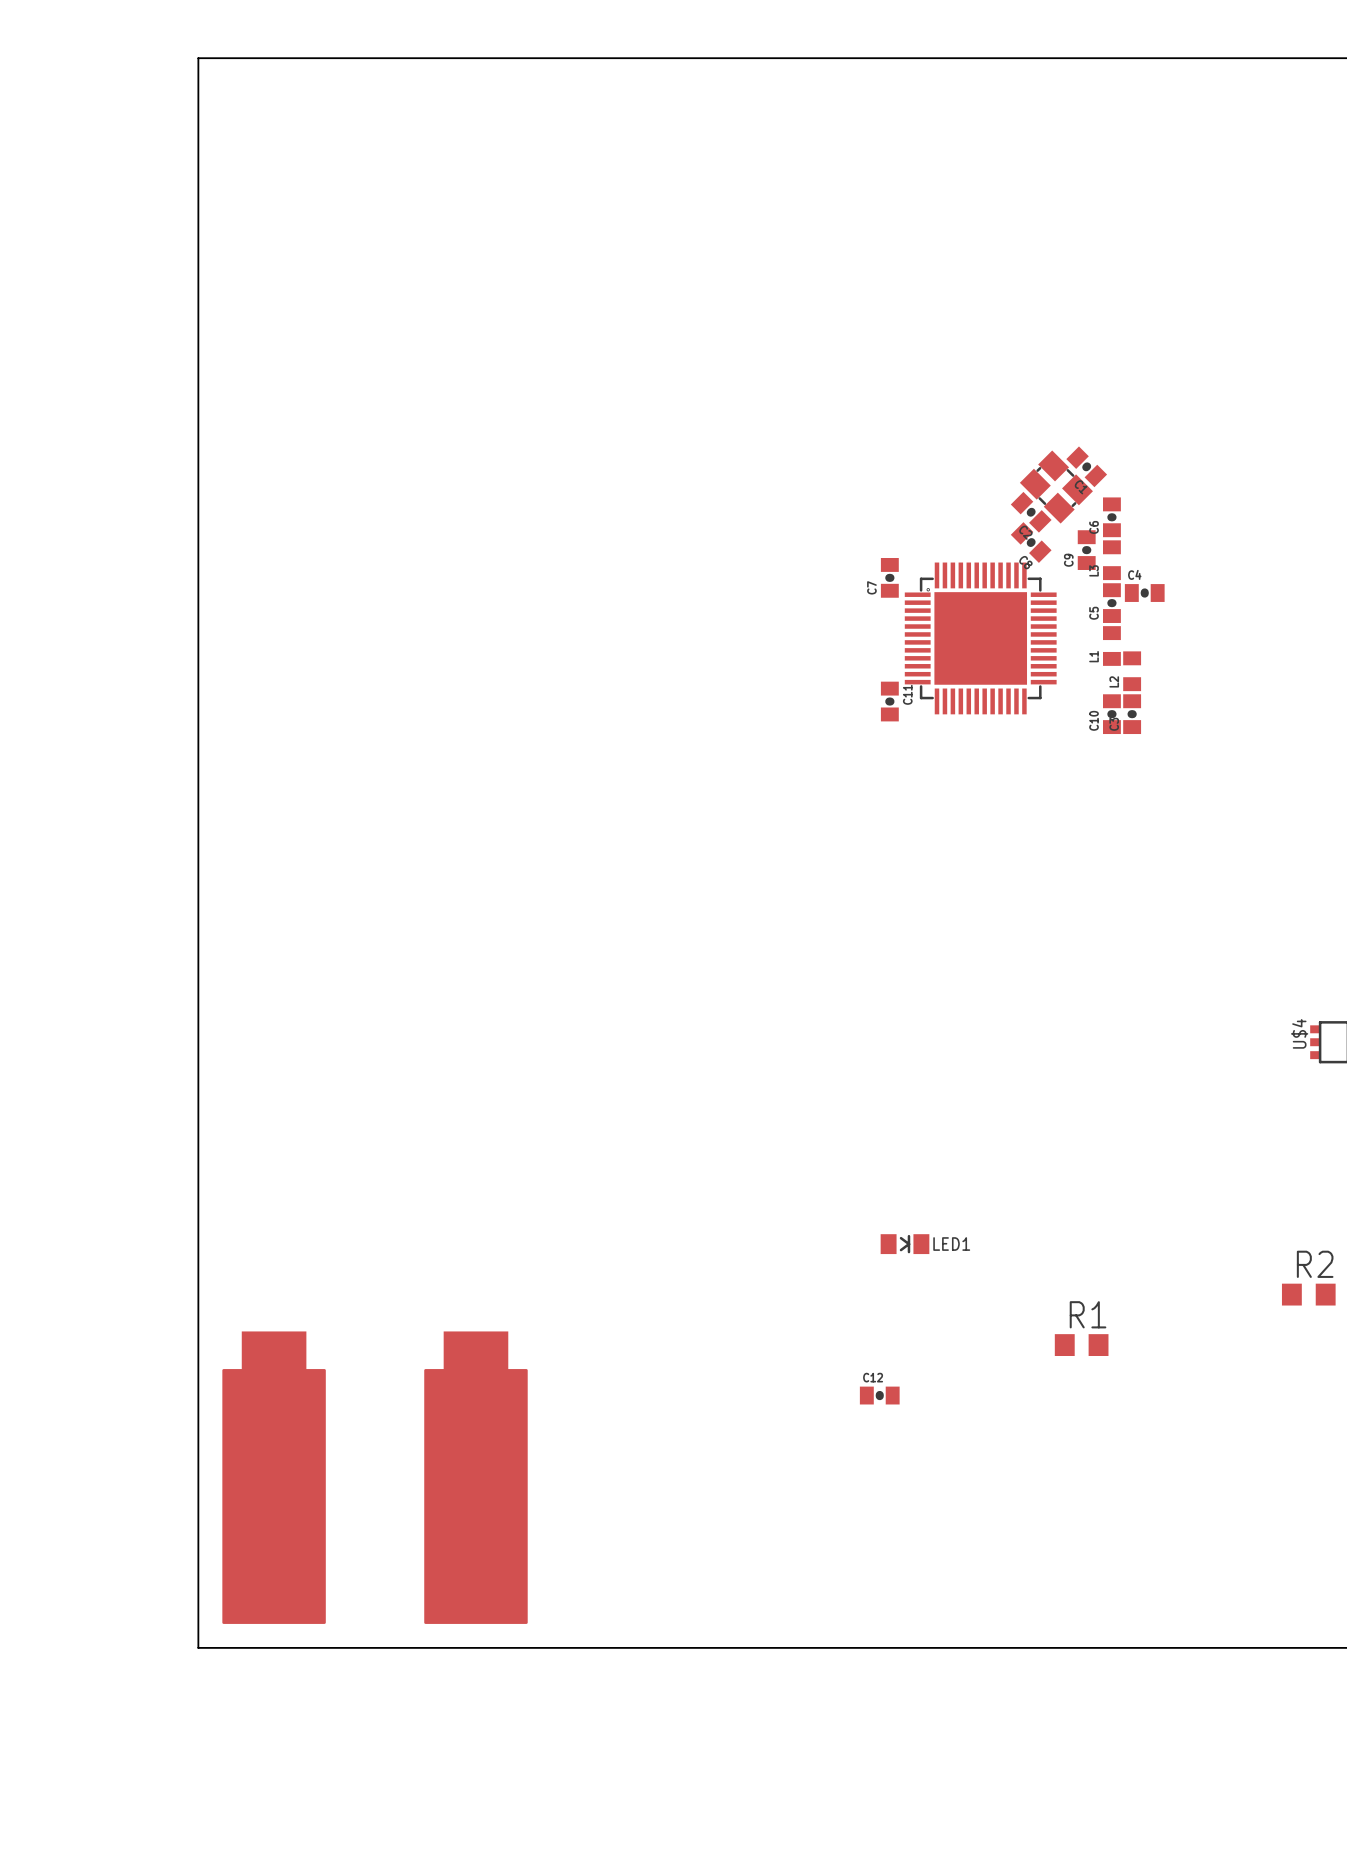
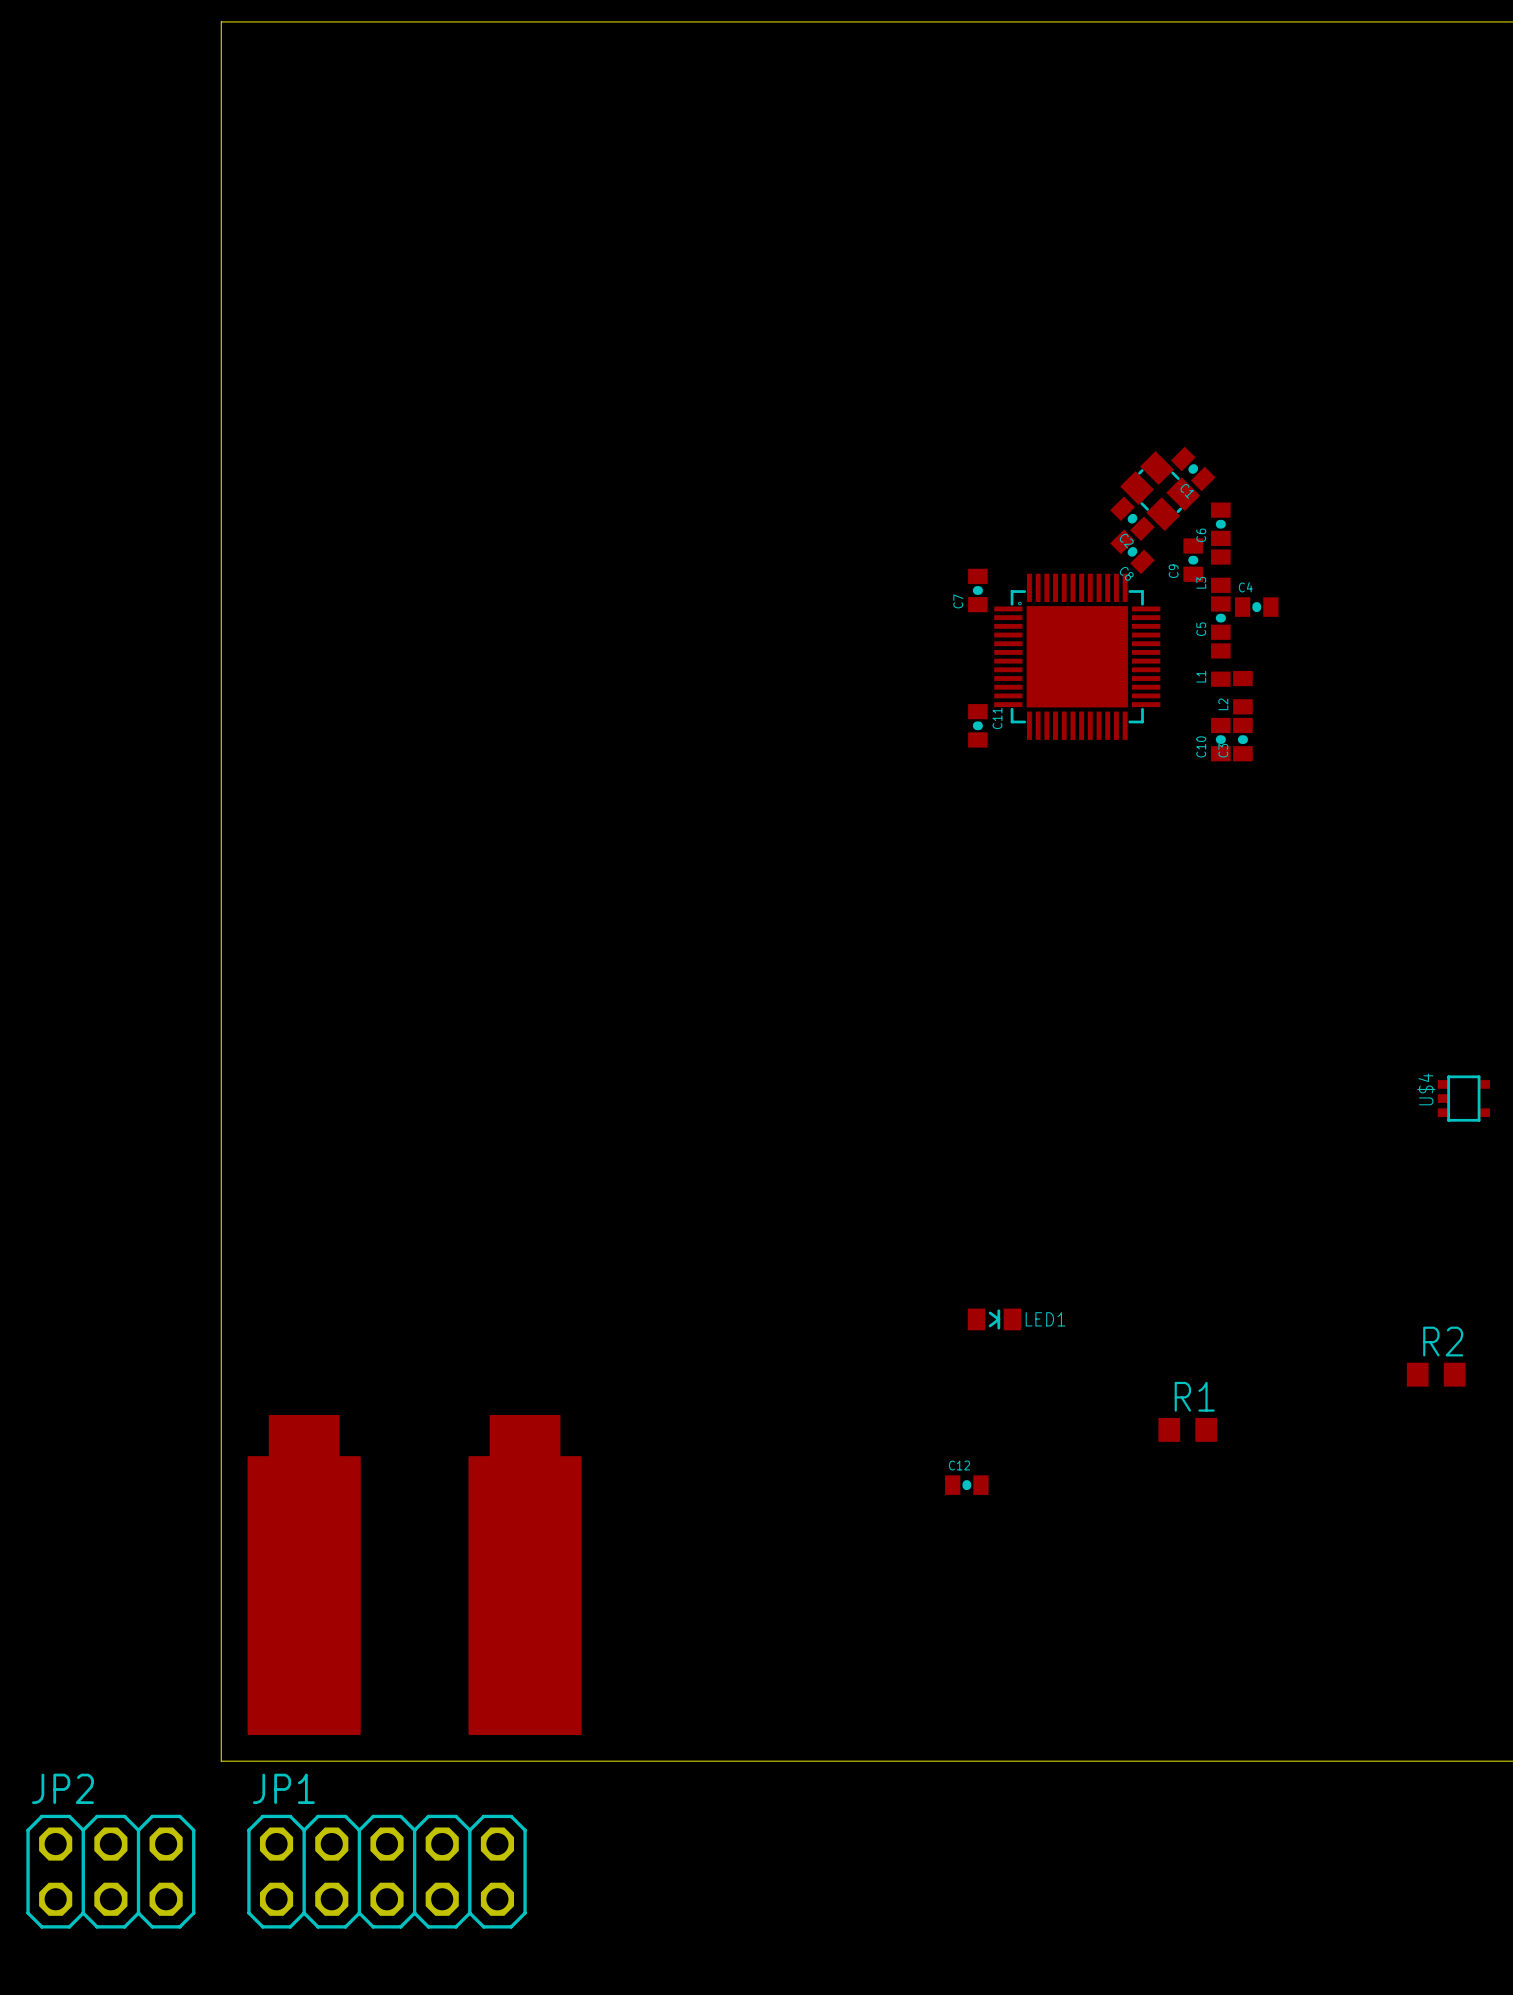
JP2: none -> (110, 1871)
JP1: none -> (386, 1871)

